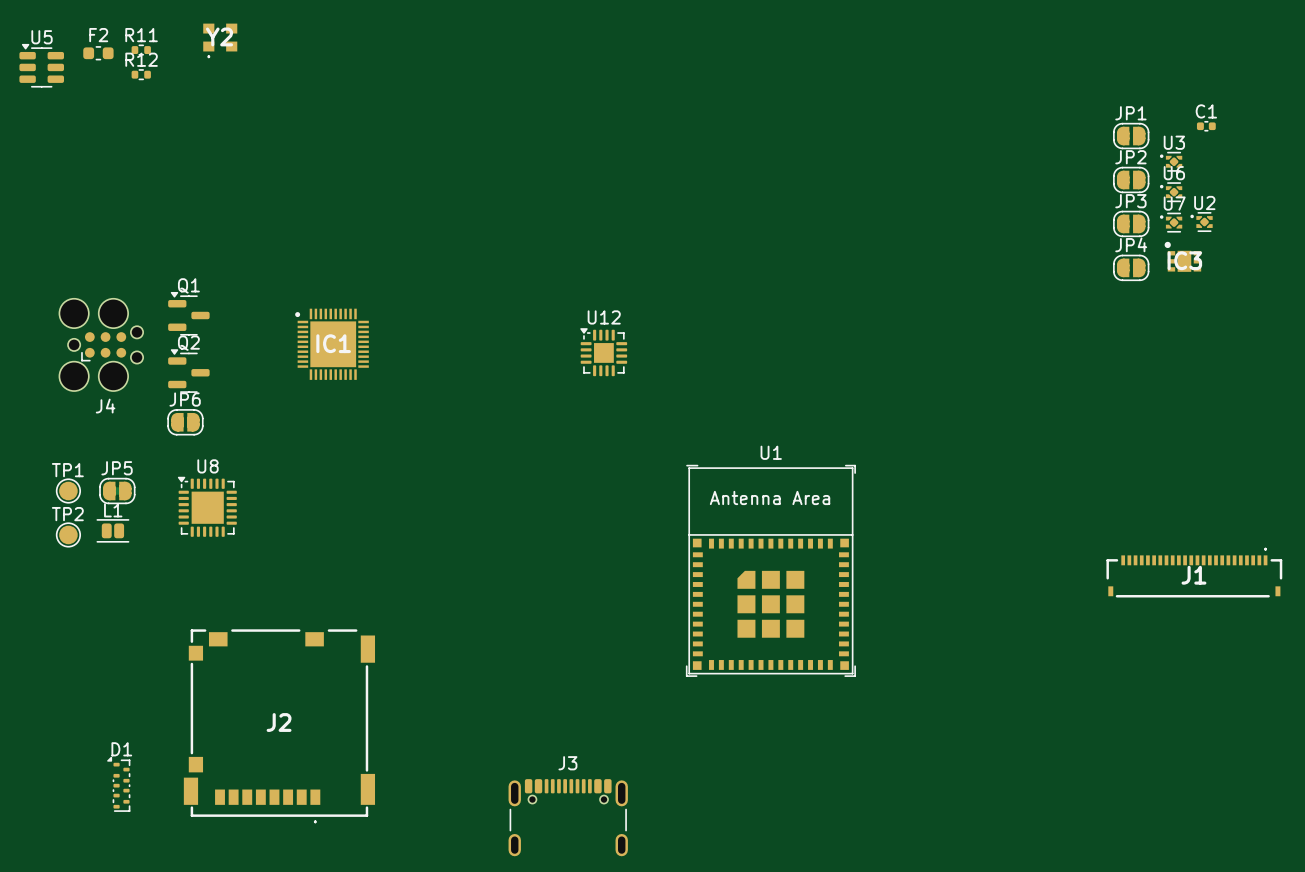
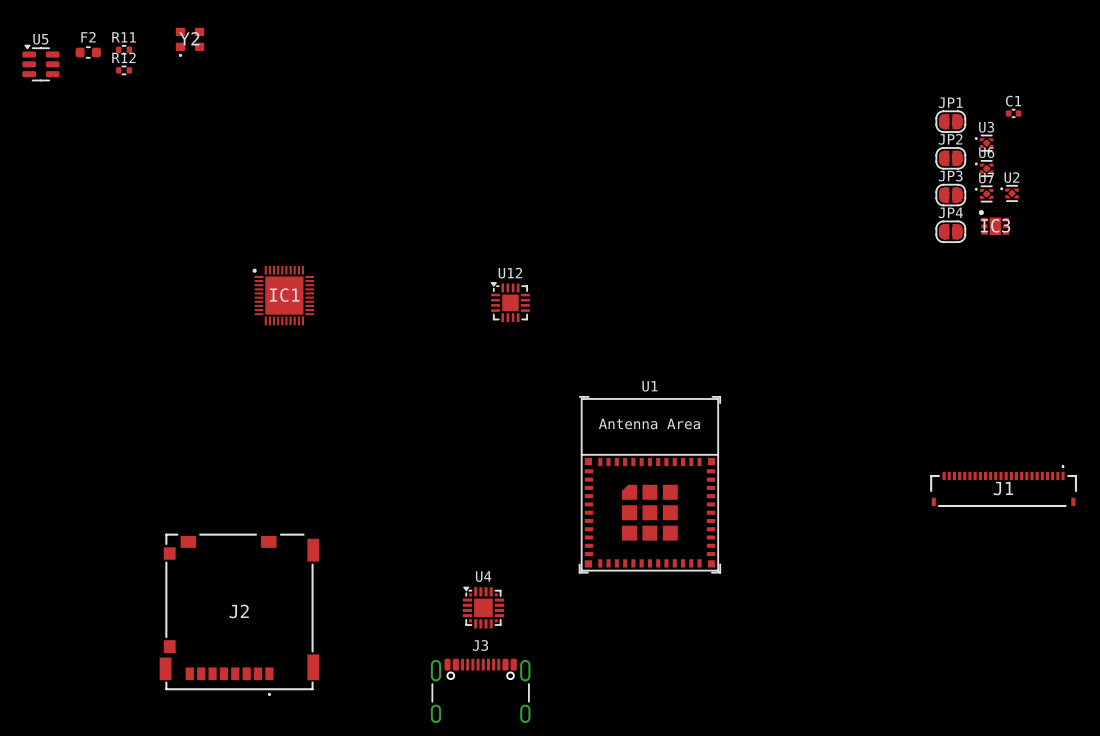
Q1: (188, 313) -> none
J4: (101, 344) -> none
Q2: (188, 371) -> none
JP6: (185, 422) -> none
TP1: (68, 491) -> none
JP5: (117, 491) -> none
U8: (207, 506) -> none
L1: (112, 530) -> none
TP2: (68, 534) -> none
U4: none -> (483, 607)
D1: (118, 784) -> none

